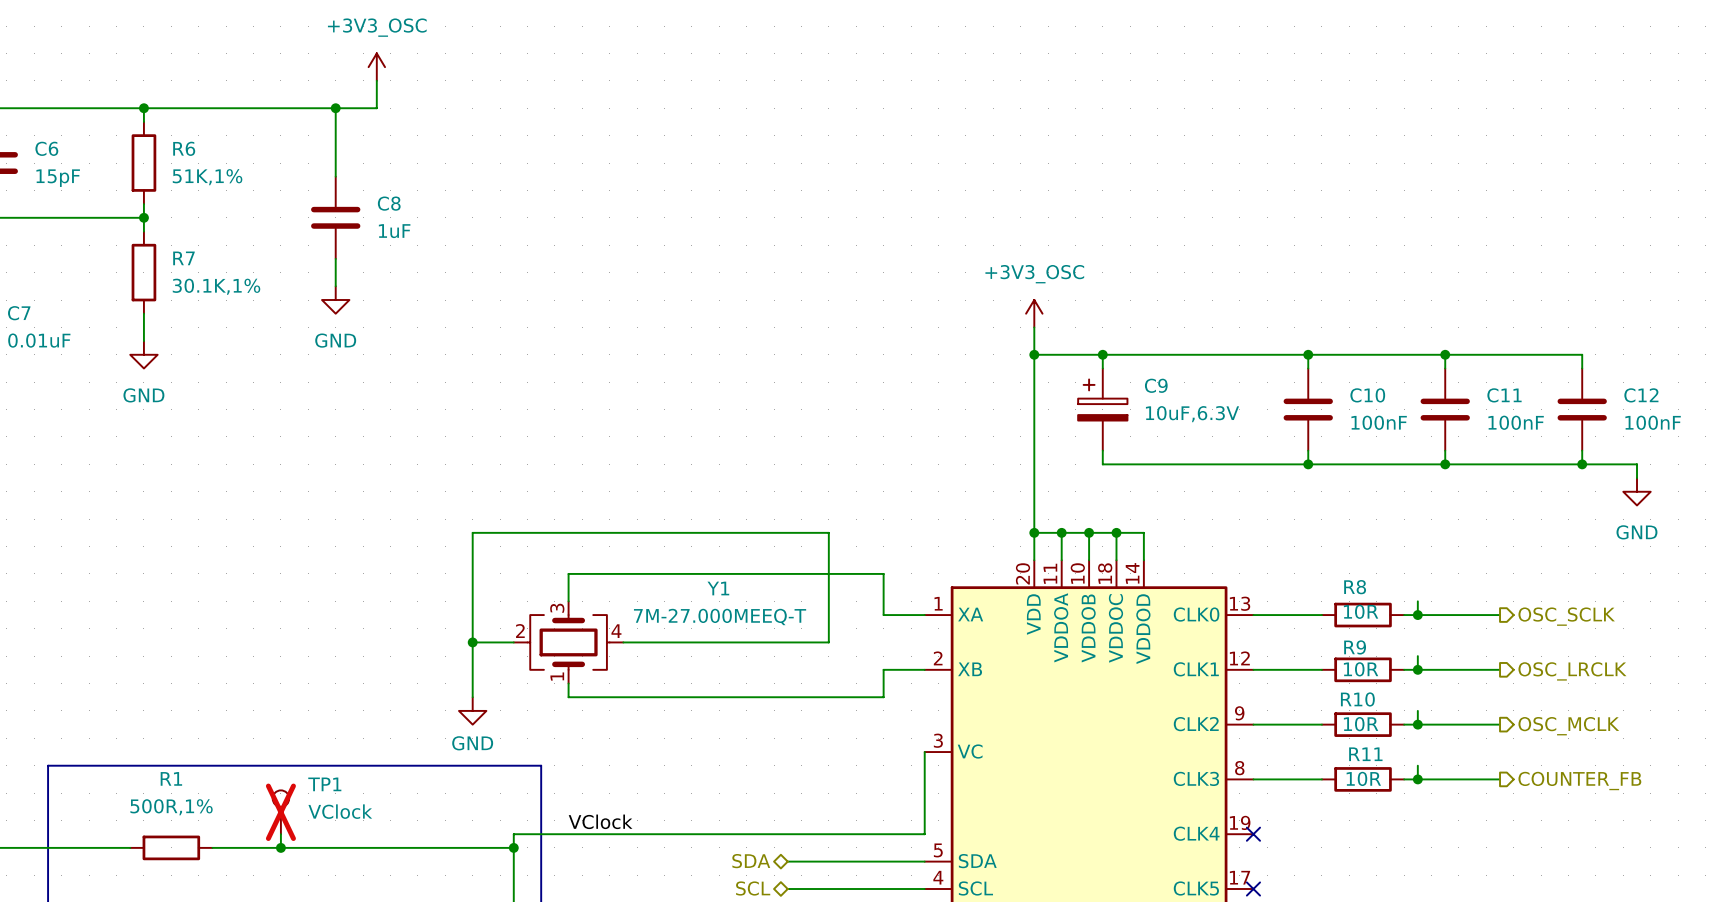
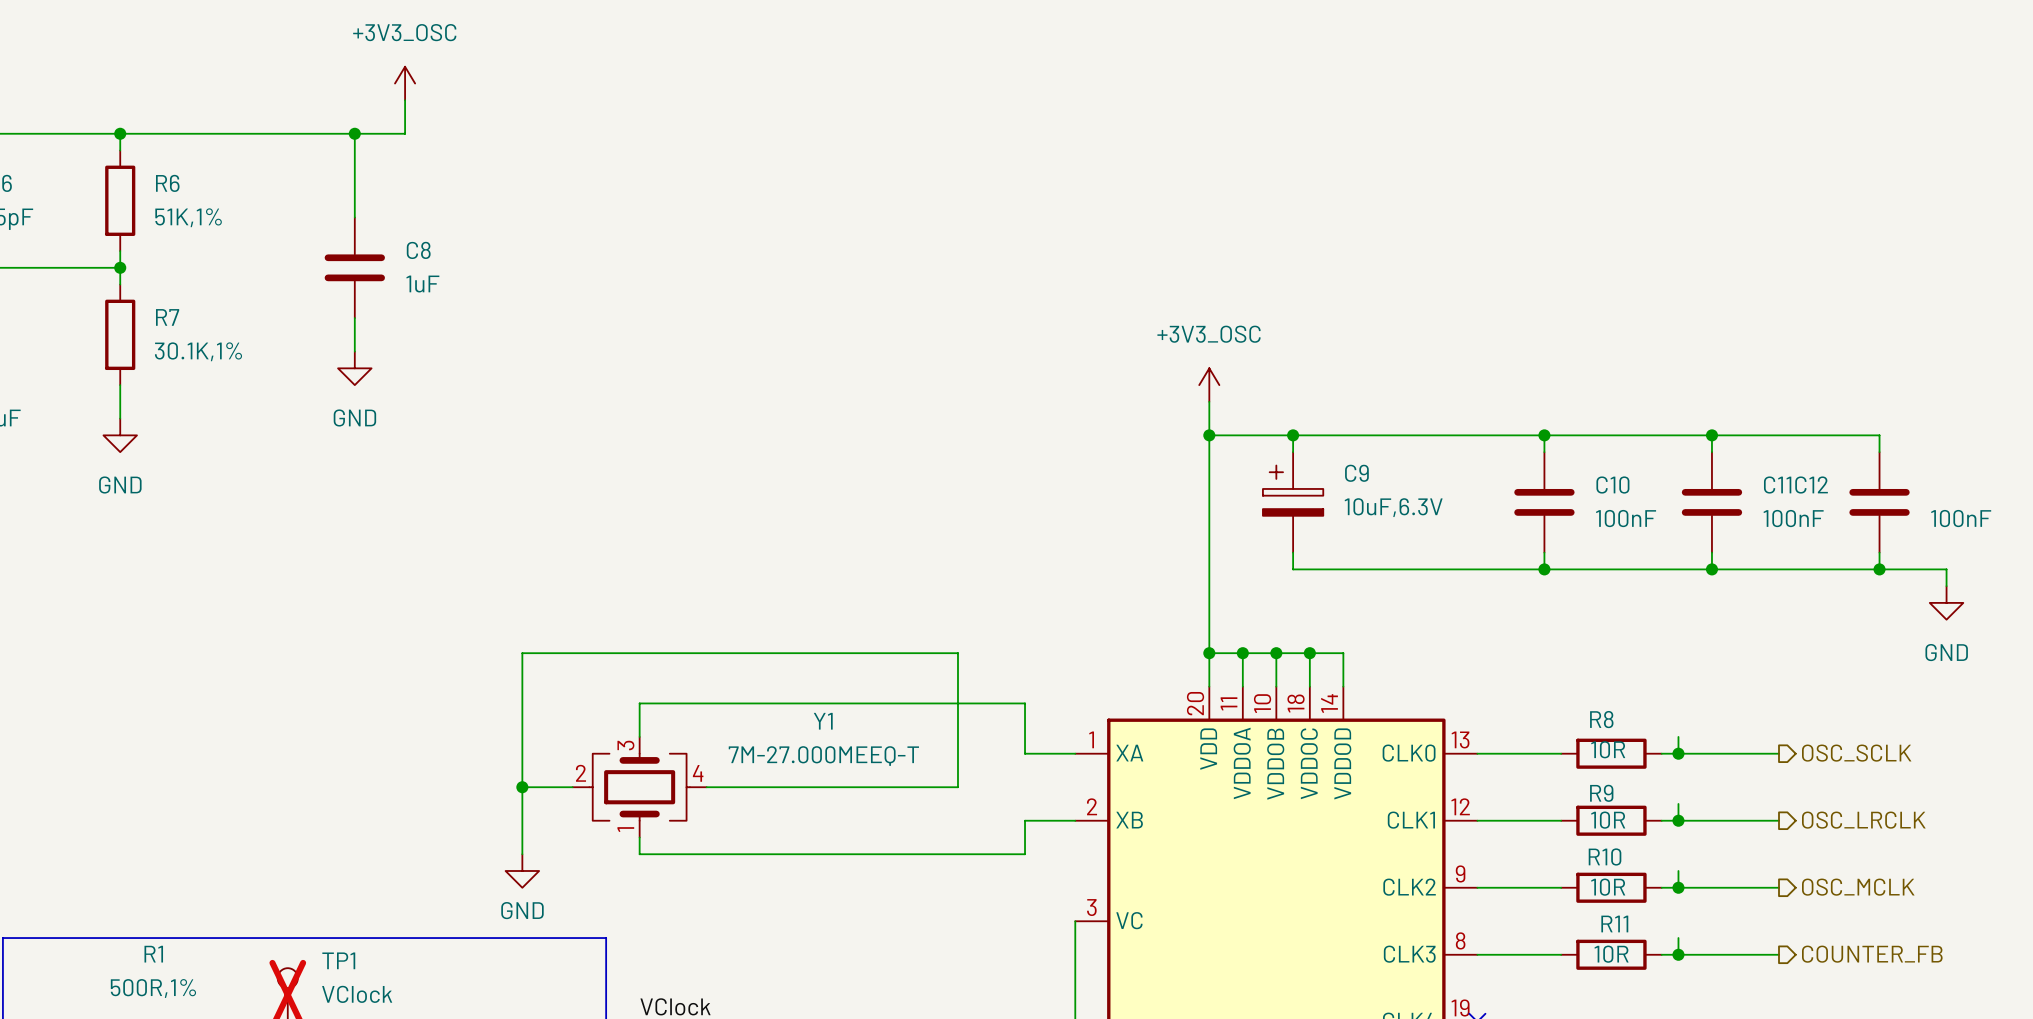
C12 name position: C12 (1641, 395) -> C12 (1811, 485)

